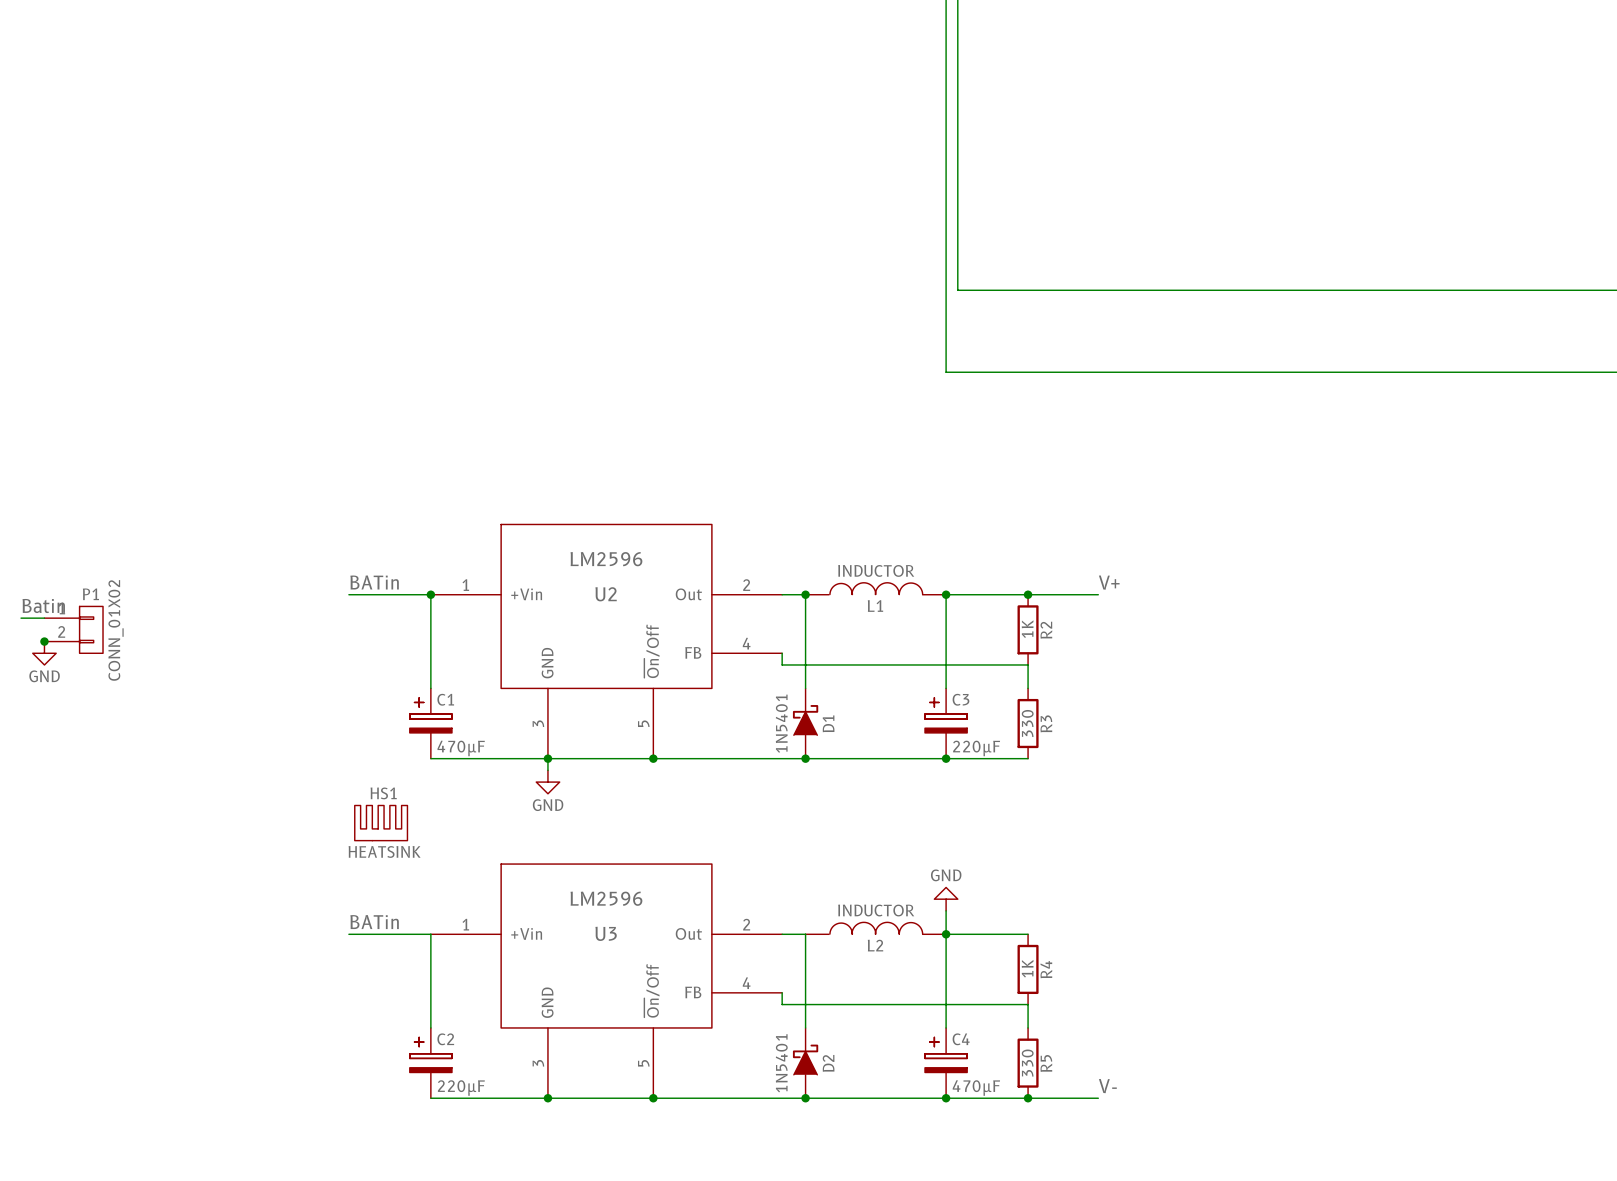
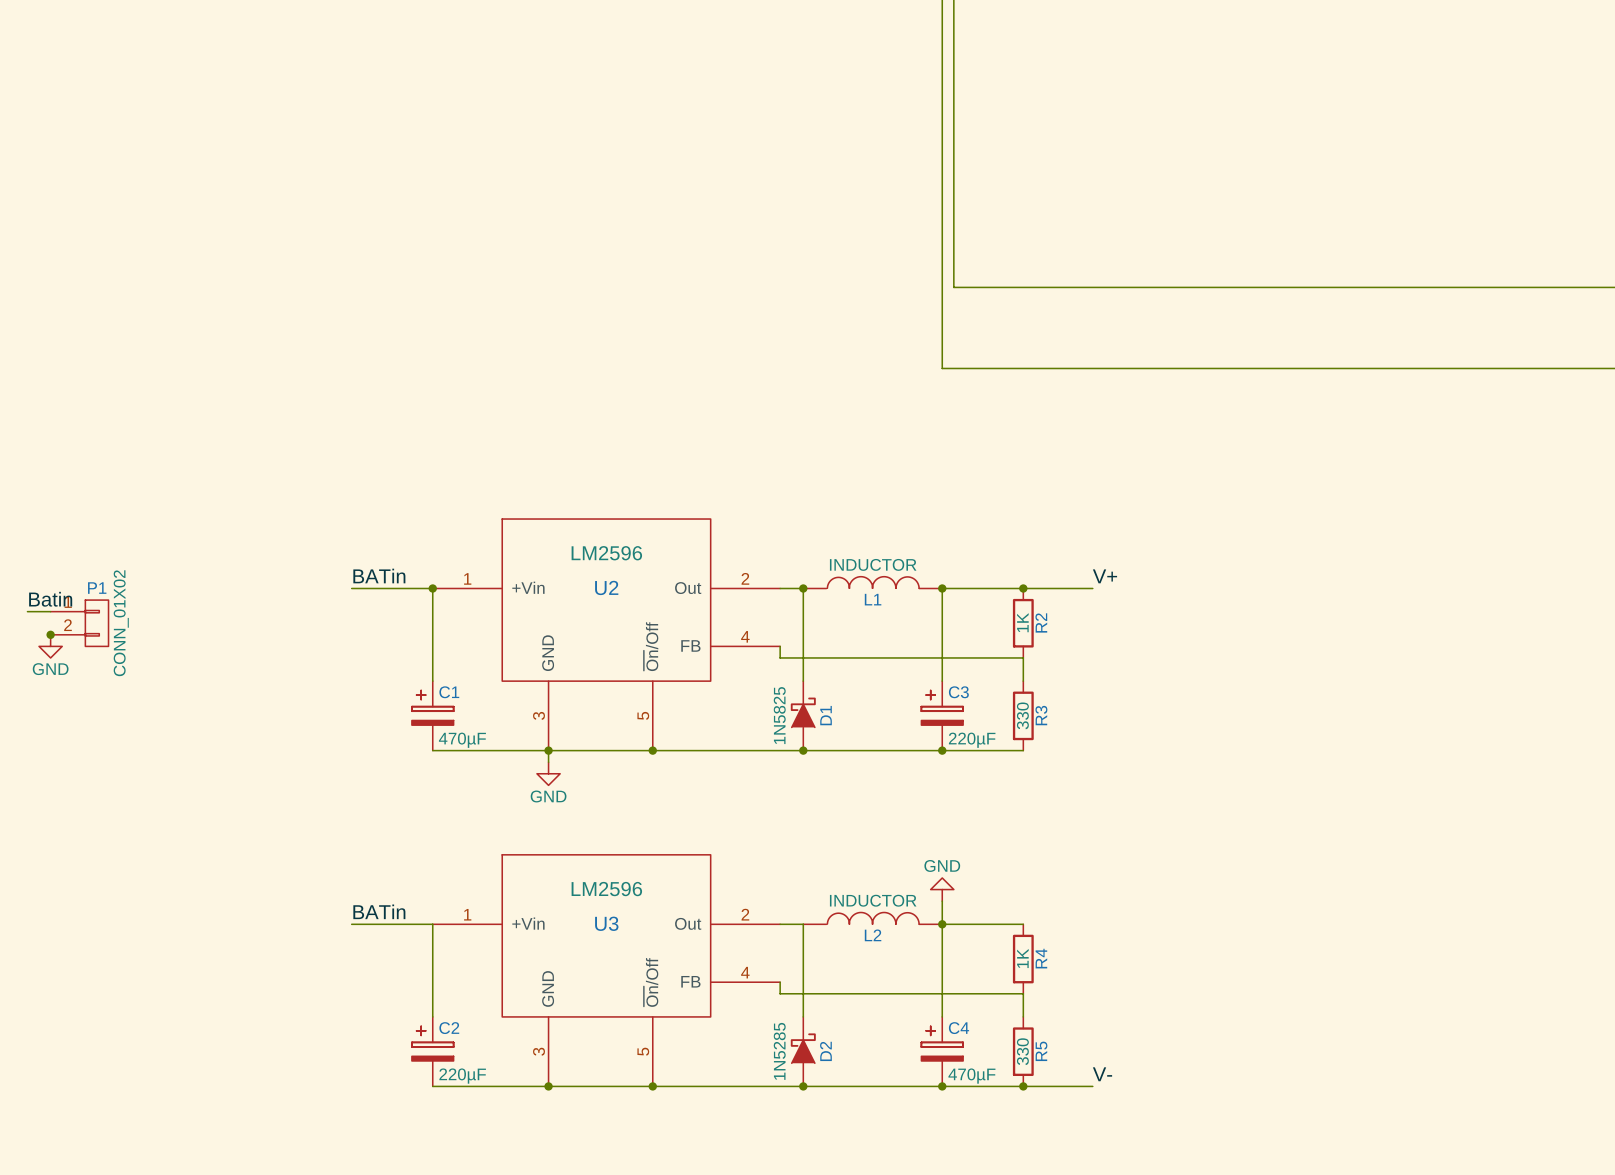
D1 value: 1N5401 (781, 723) -> 1N5825 (779, 715)
HS1: HEATSINK (381, 823) -> none
D2 value: 1N5401 (781, 1063) -> 1N5285 (779, 1051)

